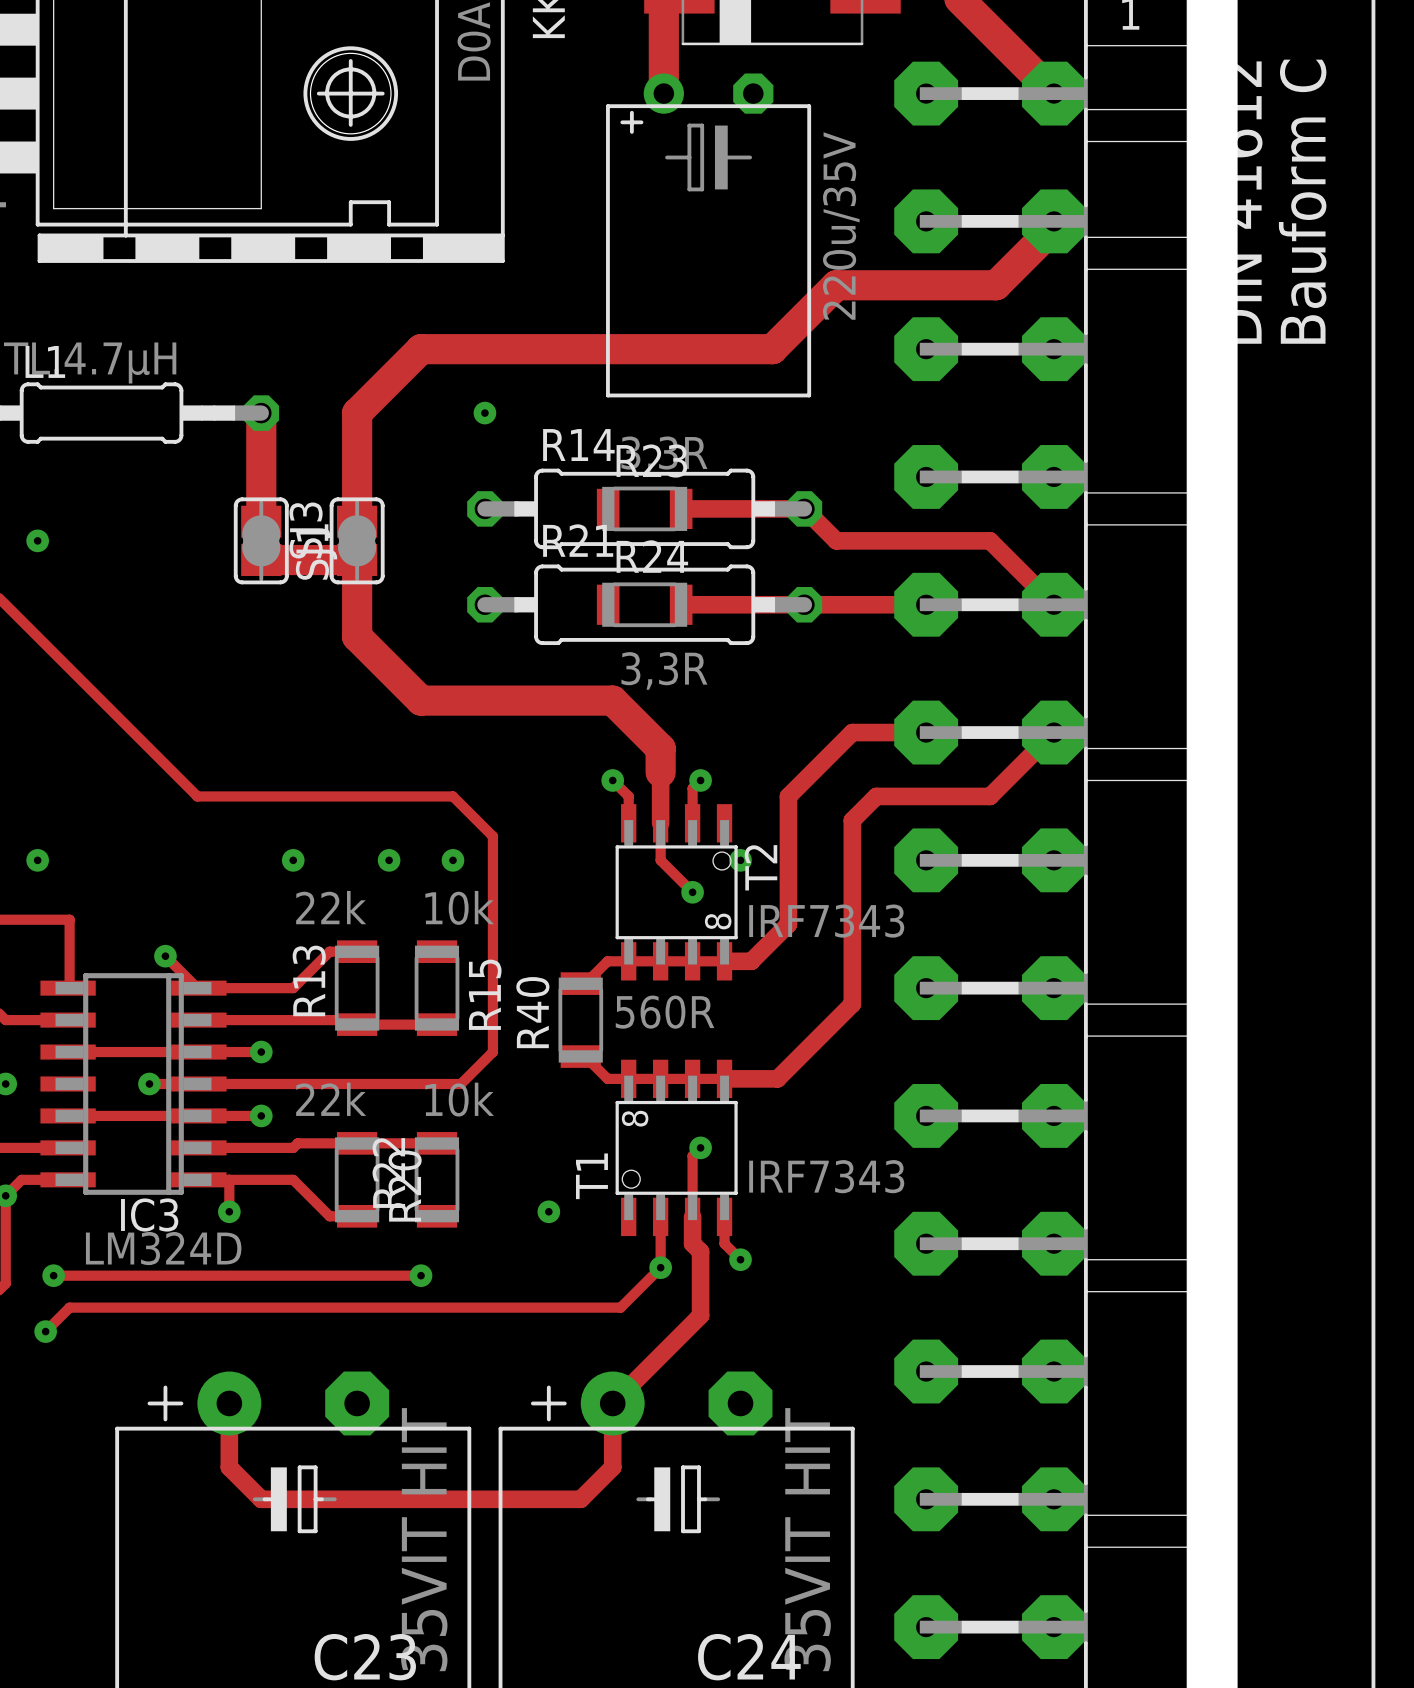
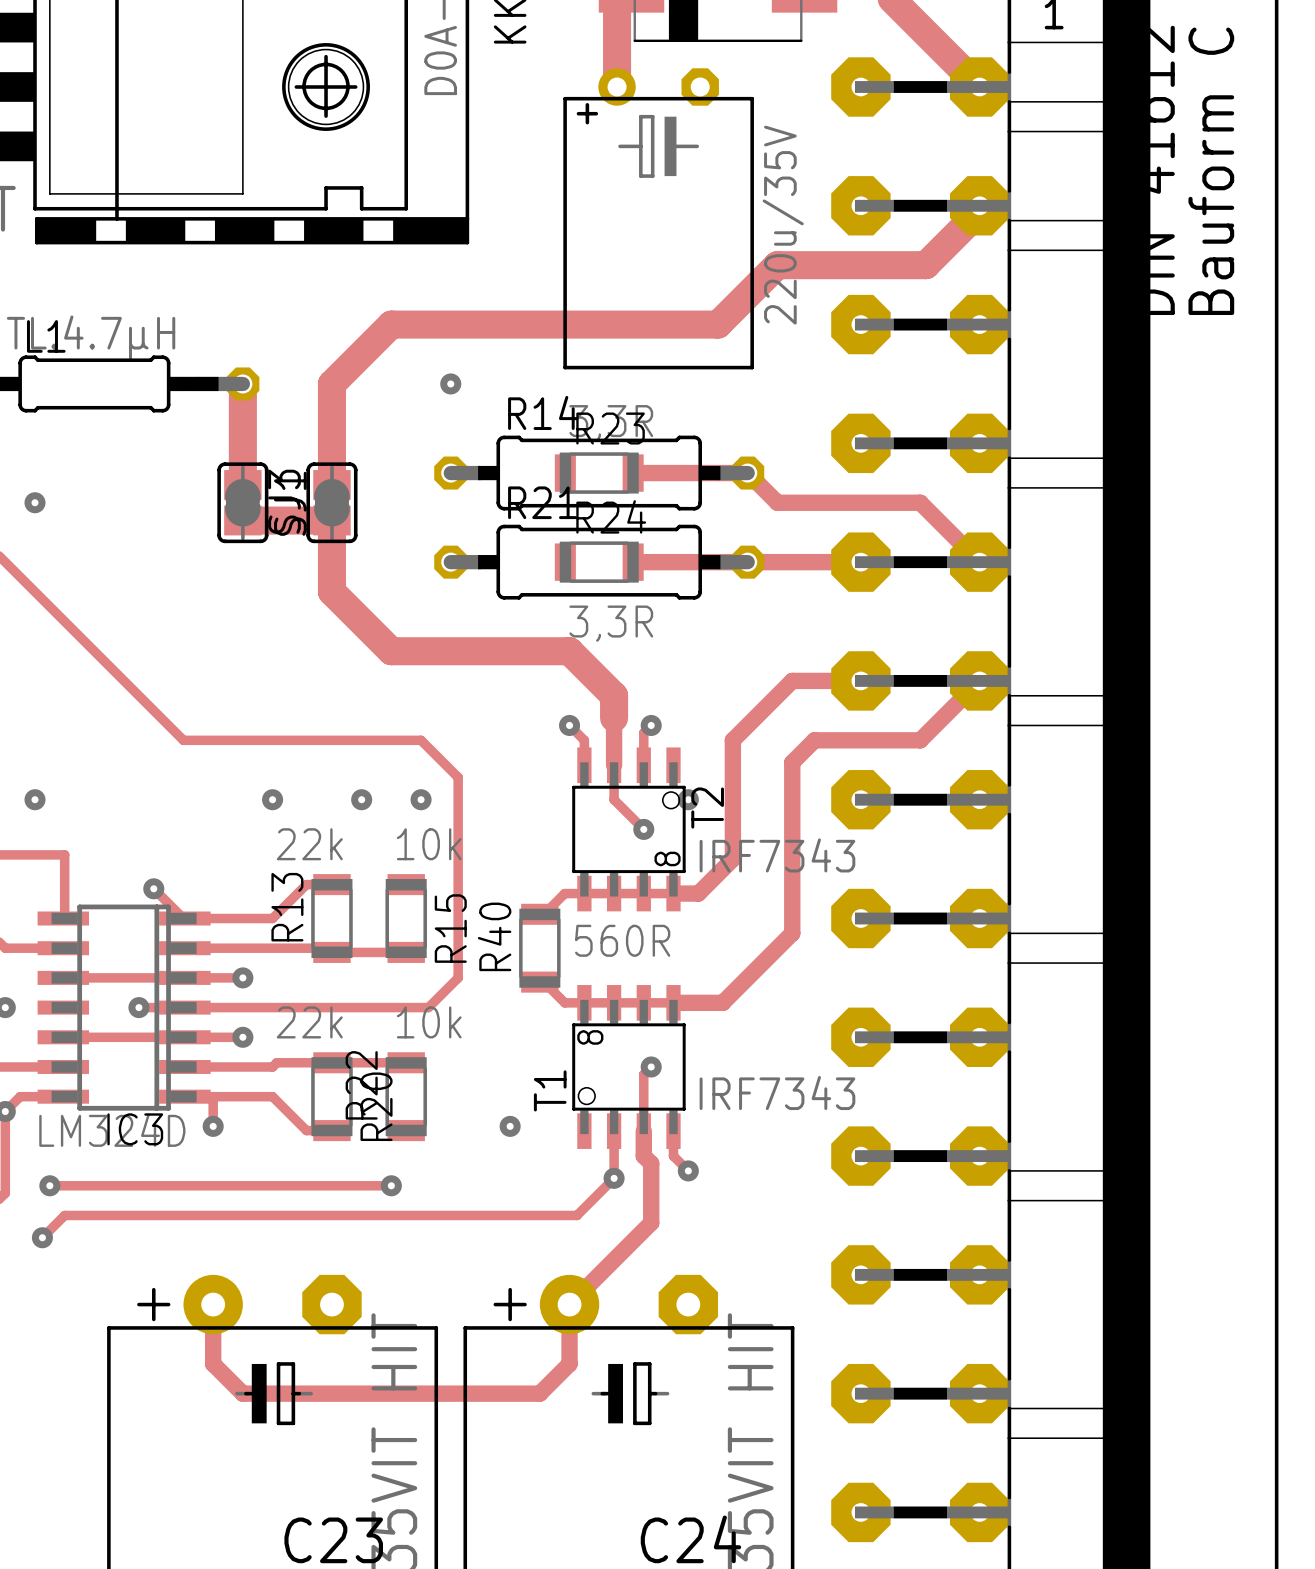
IC3 value position: LM324D (163, 1248) -> LM324D (112, 1130)

